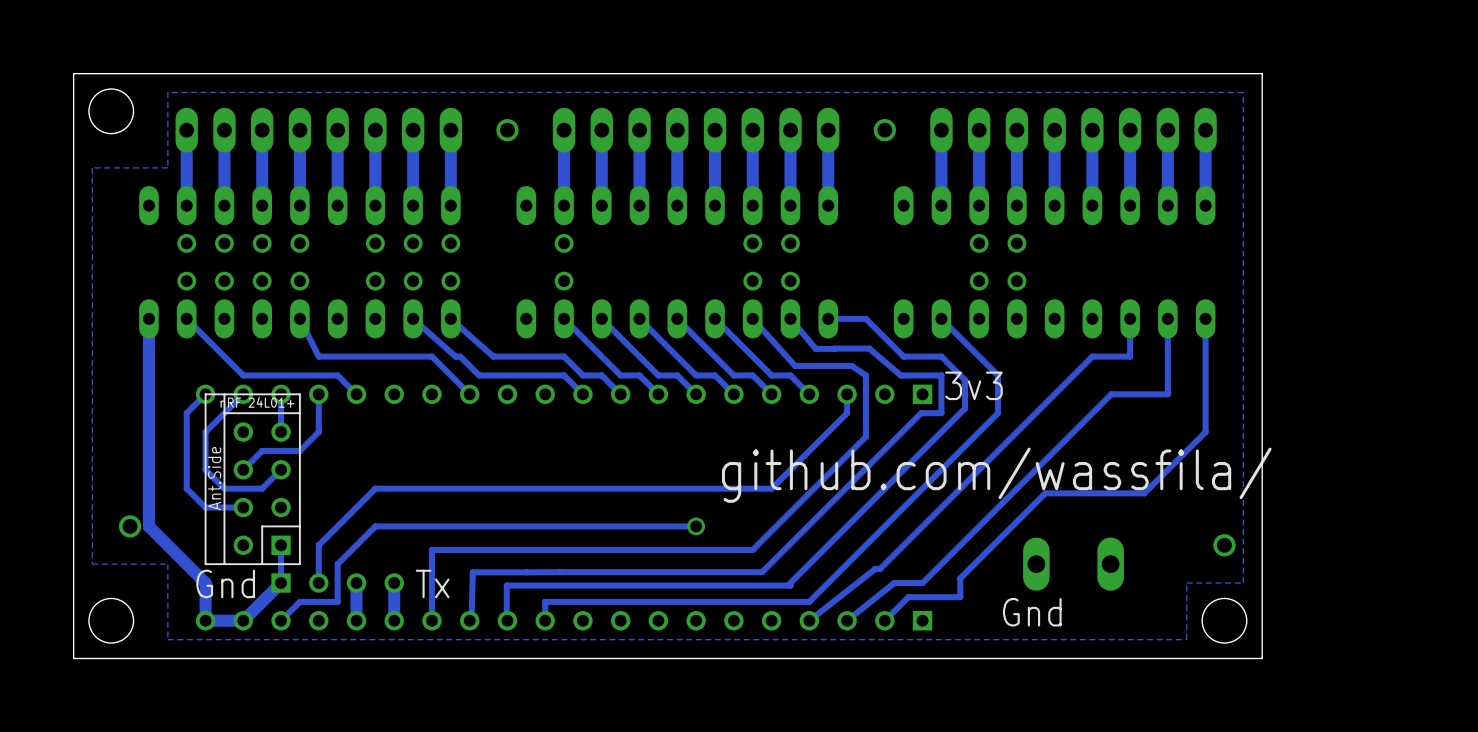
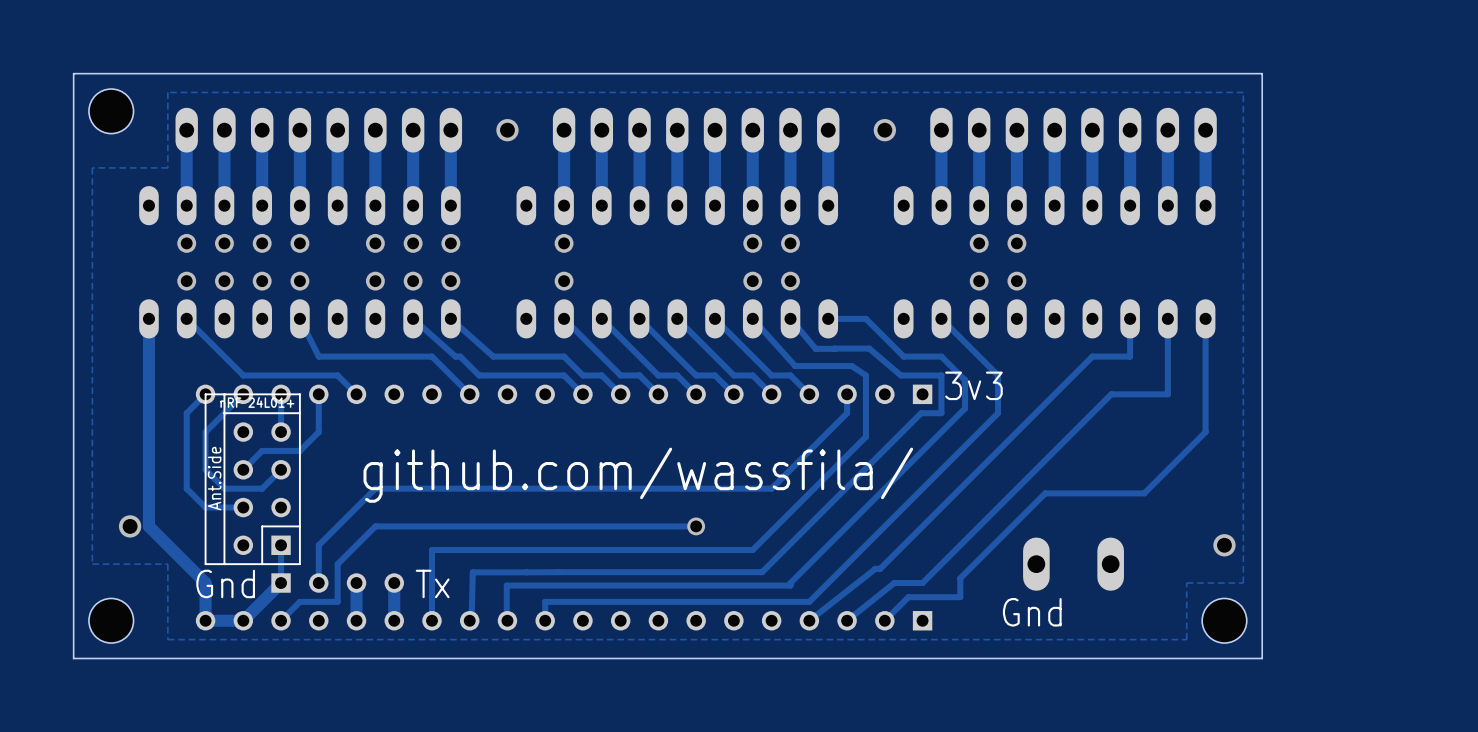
text position: github.com/wassfila/ (996, 475) -> github.com/wassfila/ (638, 475)

